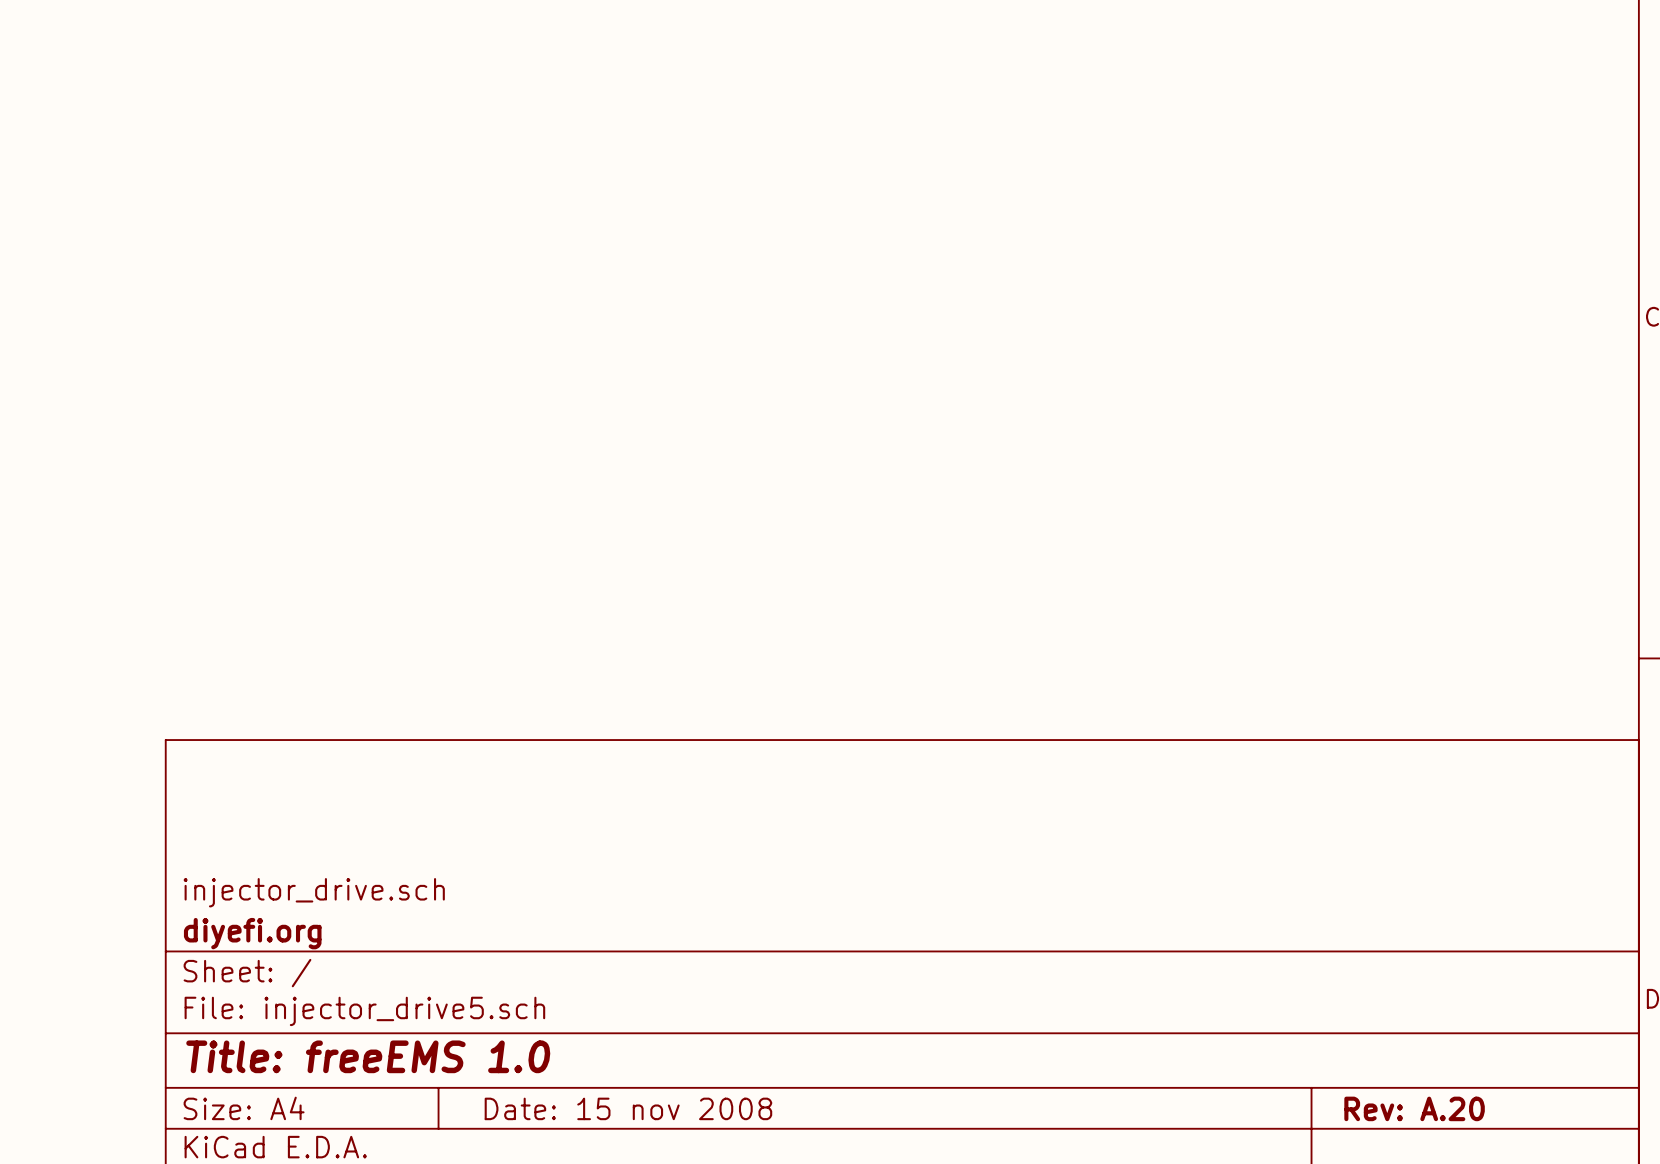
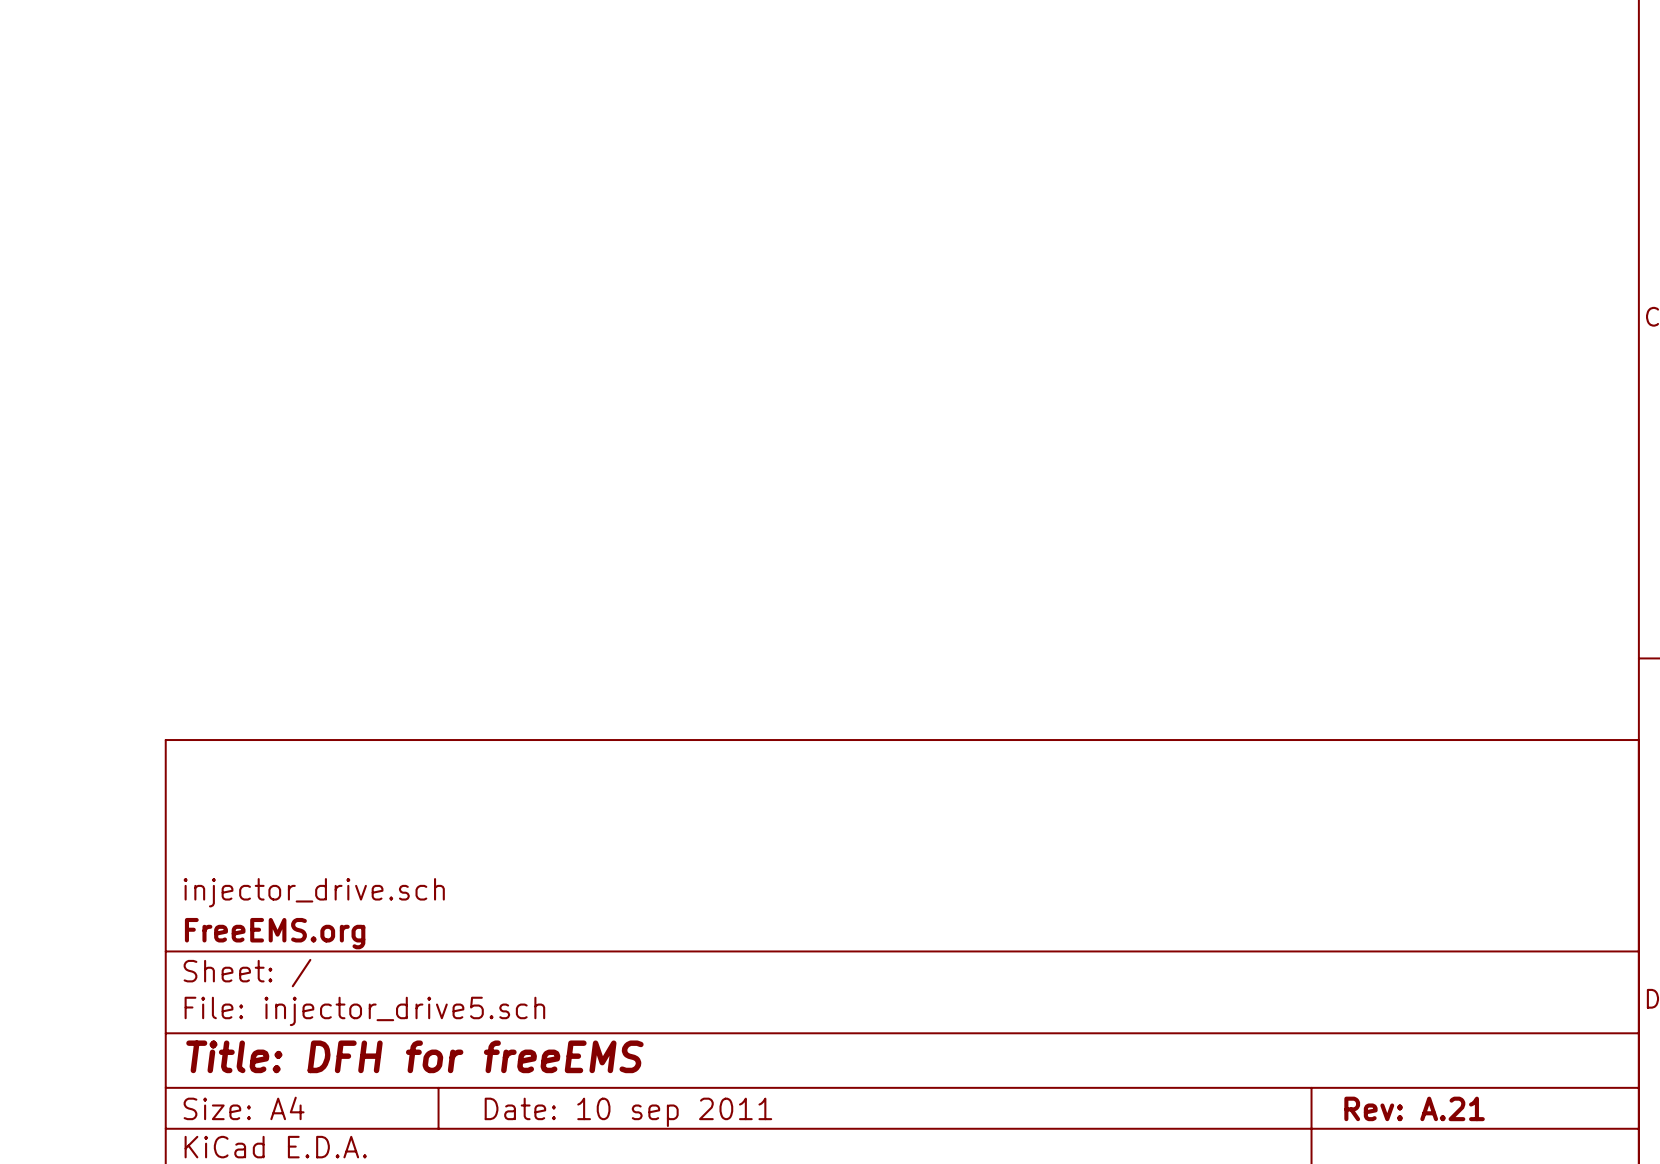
title block: diyefi.org (252, 933) -> FreeEMS.org (275, 933)
title block: Title: freeEMS 1.0 (368, 1056) -> Title: DFH for freeEMS (414, 1056)
title block: Date: 15 nov 2008 (628, 1108) -> Date: 10 sep 2011 (628, 1112)
title block: Rev: A.20 (1414, 1108) -> Rev: A.21 (1414, 1108)

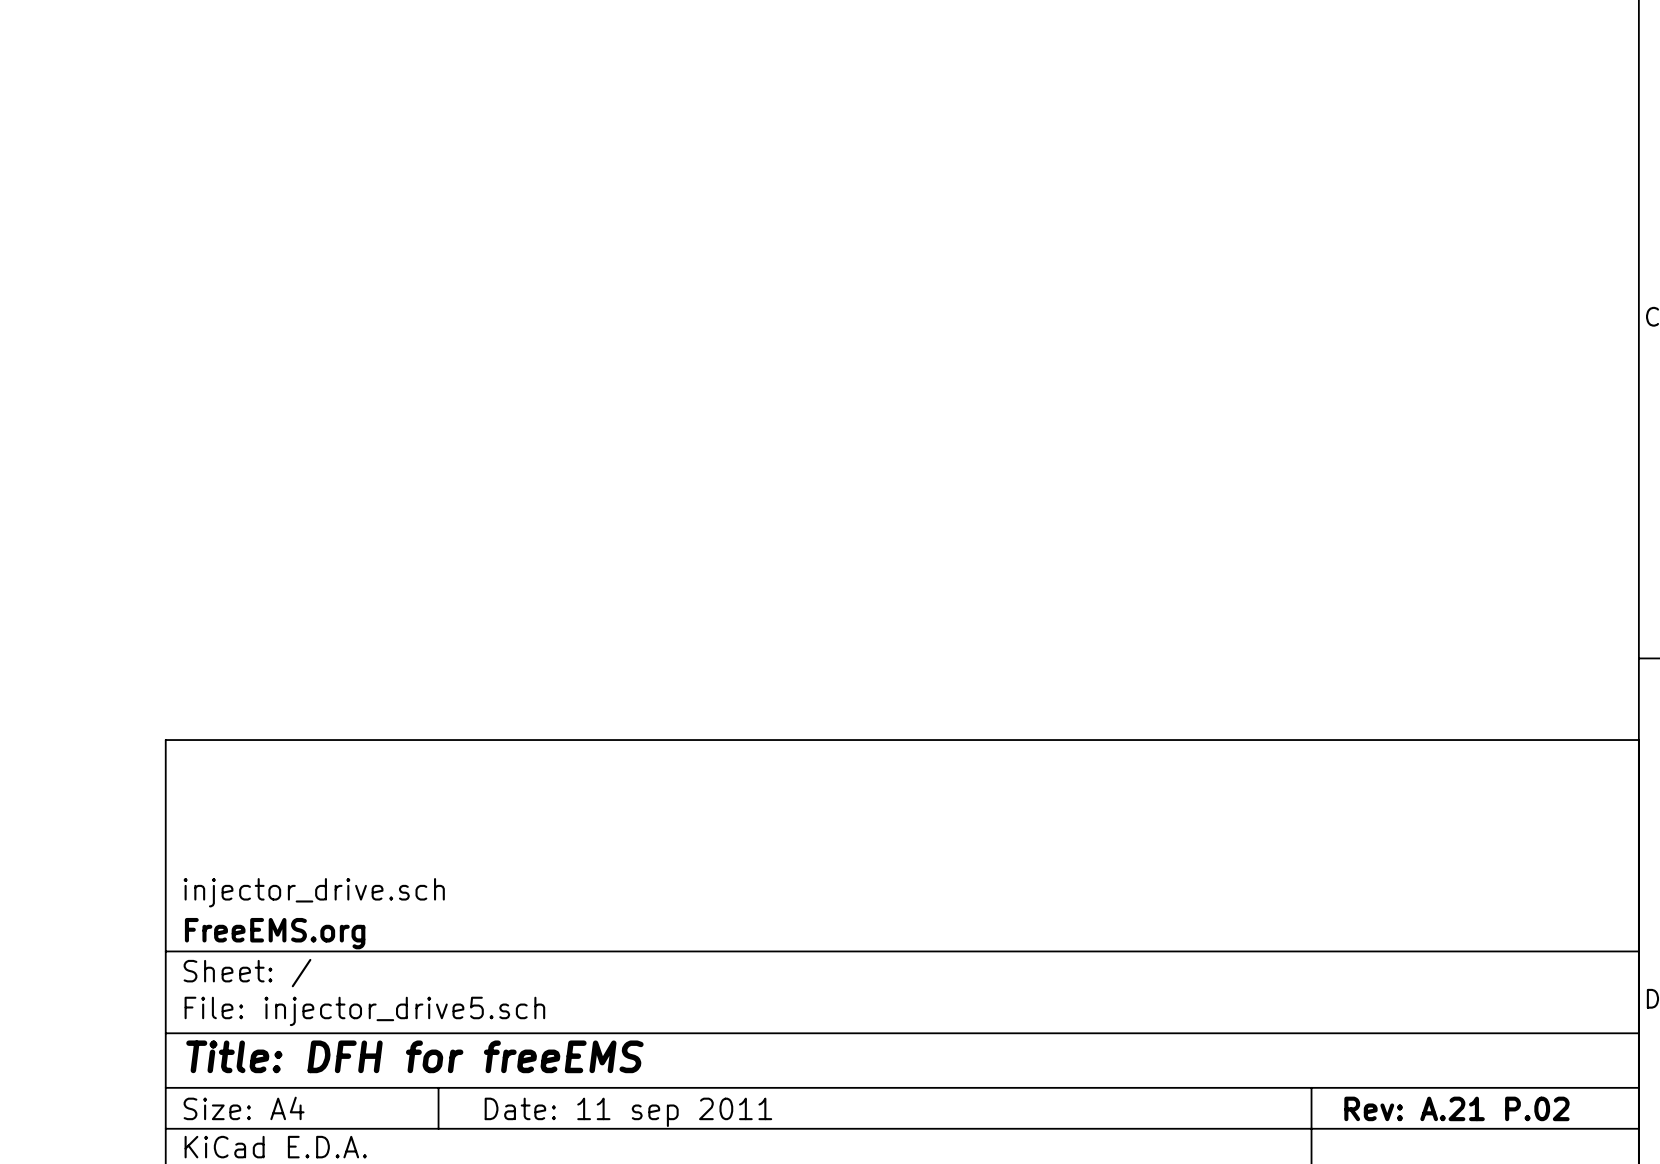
title block: Rev: A.21 (1414, 1108) -> Rev: A.21 P.02 (1456, 1108)
title block: Date: 10 sep 2011 (628, 1112) -> Date: 11 sep 2011 (628, 1112)

